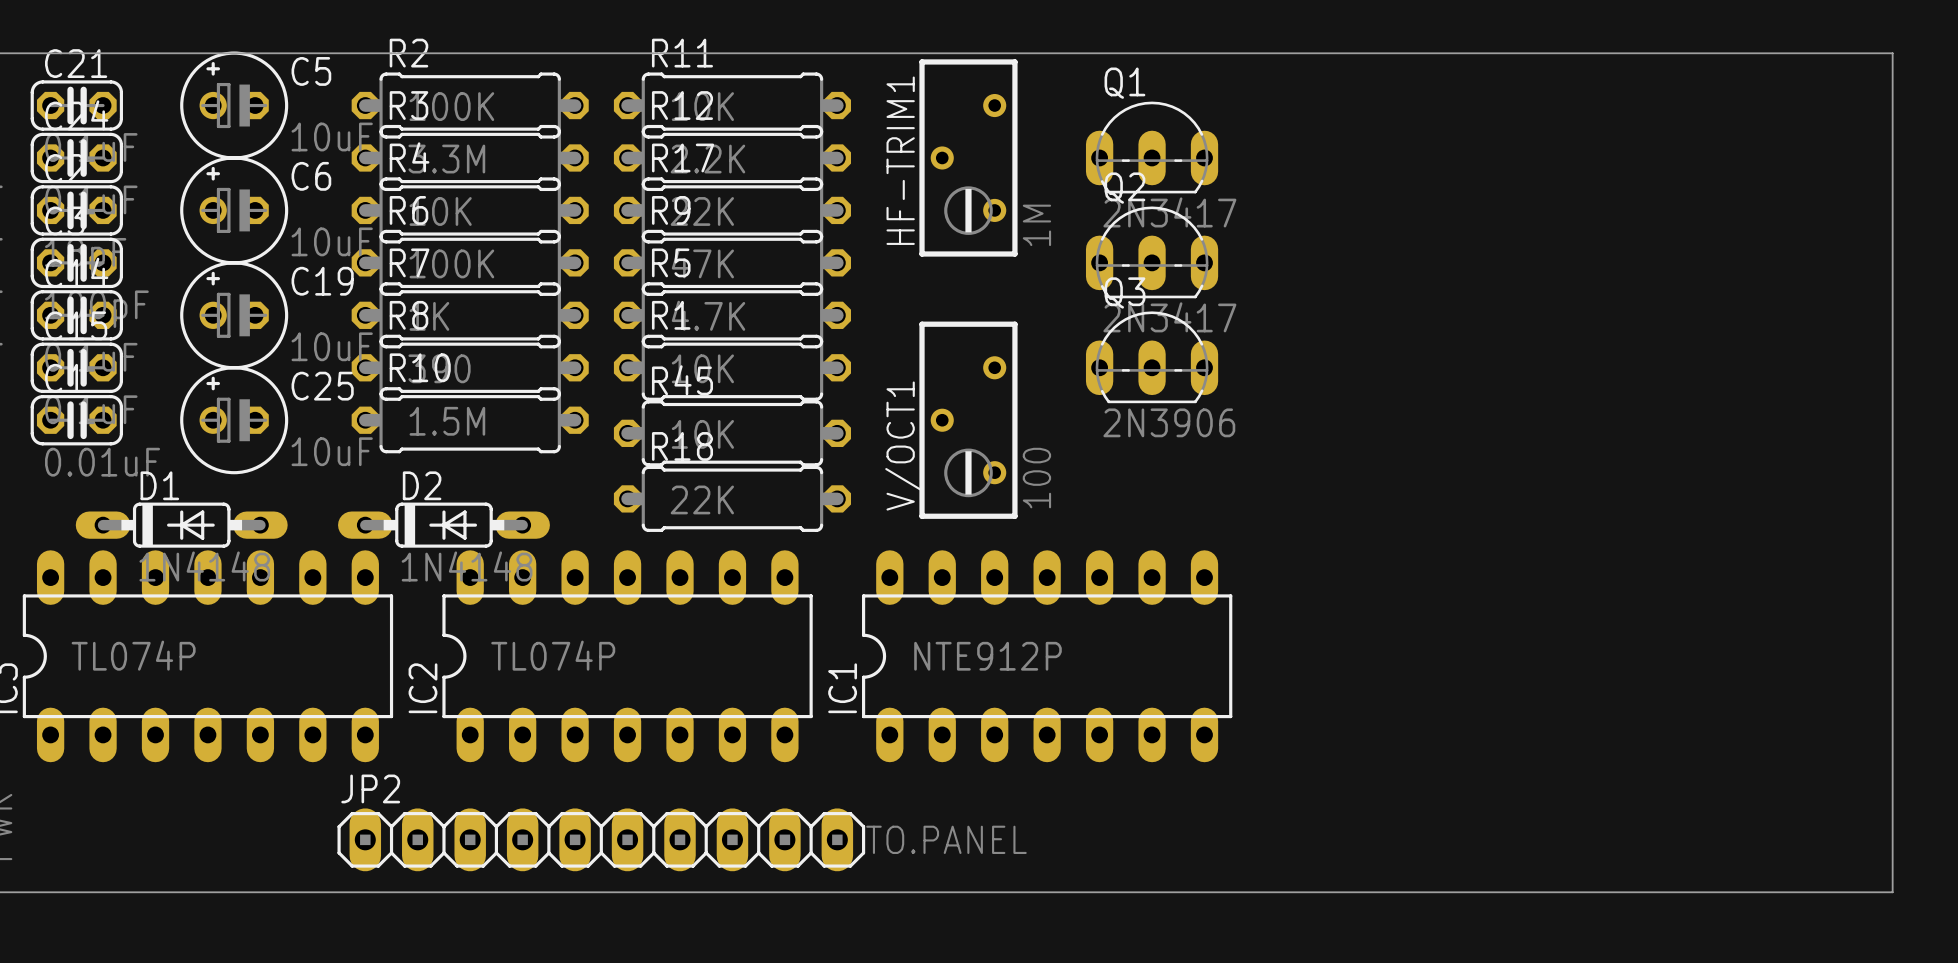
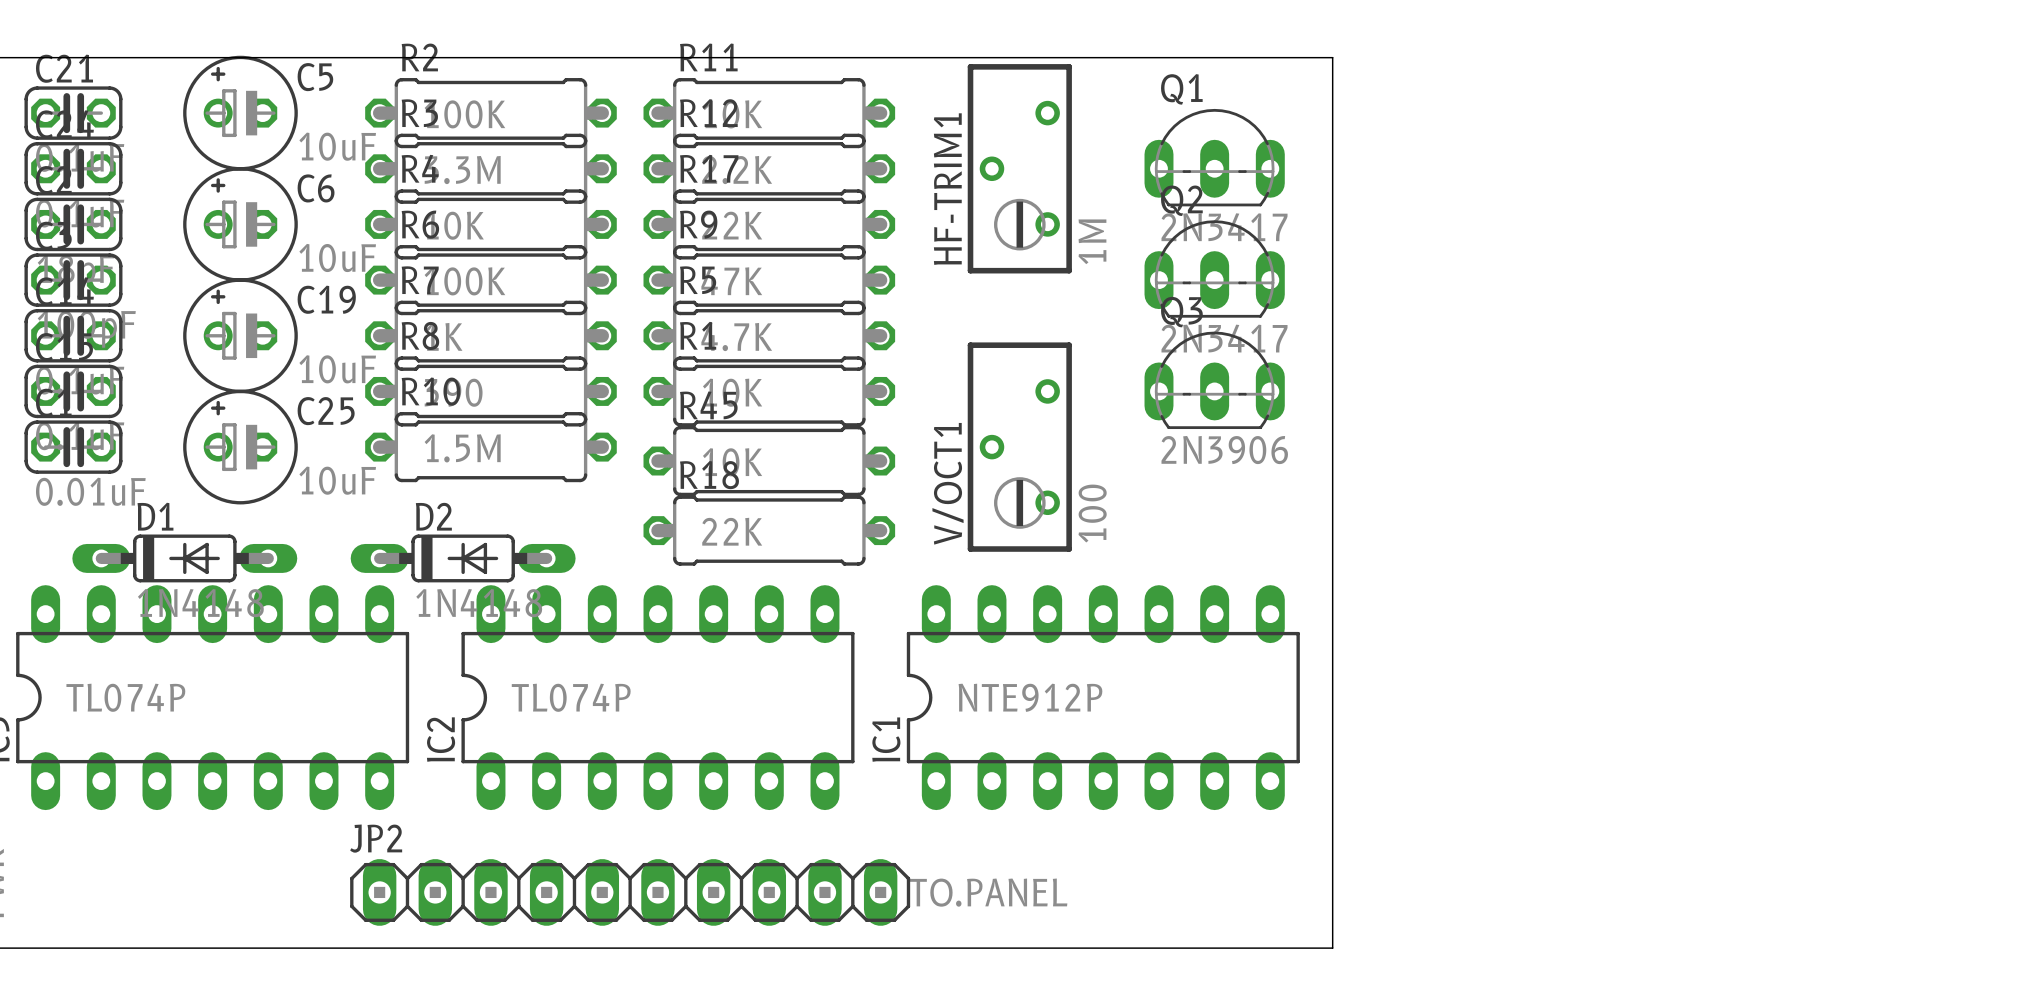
board edge: (1263, 53) (1892, 53) (1892, 892) (1263, 892) -> (1332, 57) (1332, 948)

